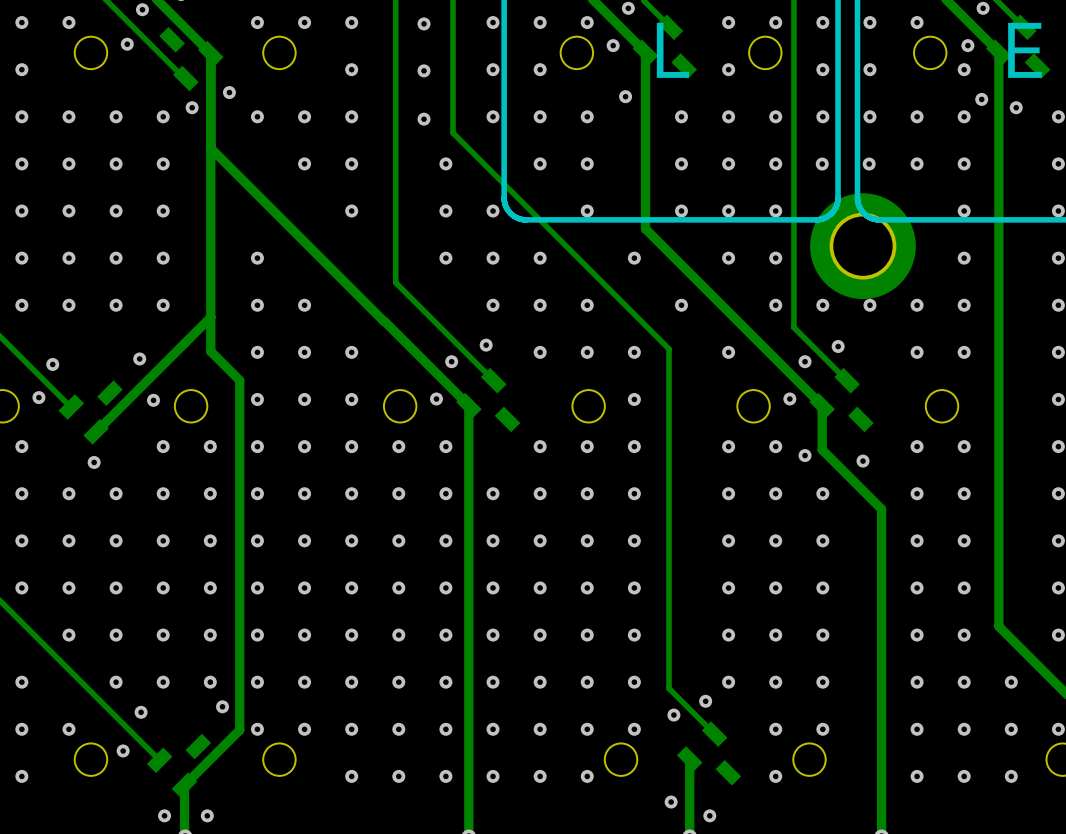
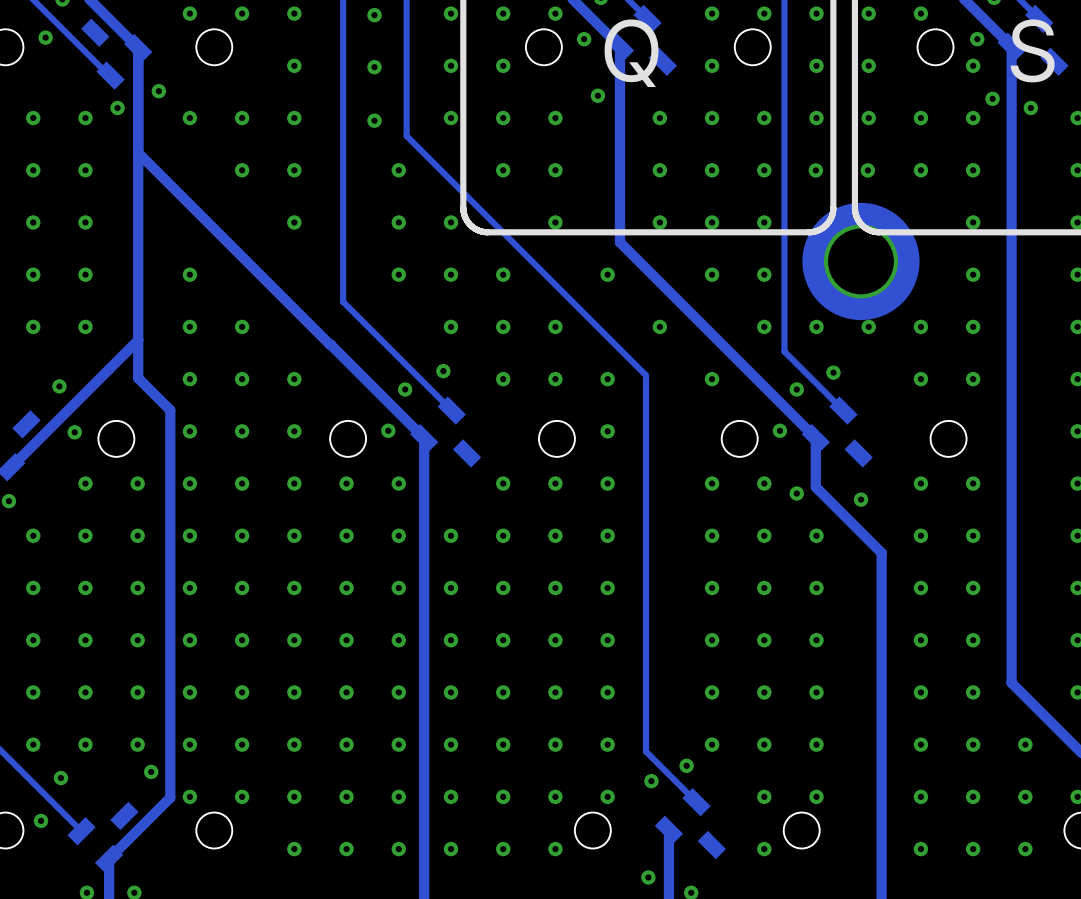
drawing: [656, 22, 690, 78] -> none
drawing shape: [1008, 22, 1042, 78] -> [1010, 19, 1055, 83]
drawing: none -> [604, 19, 659, 88]

